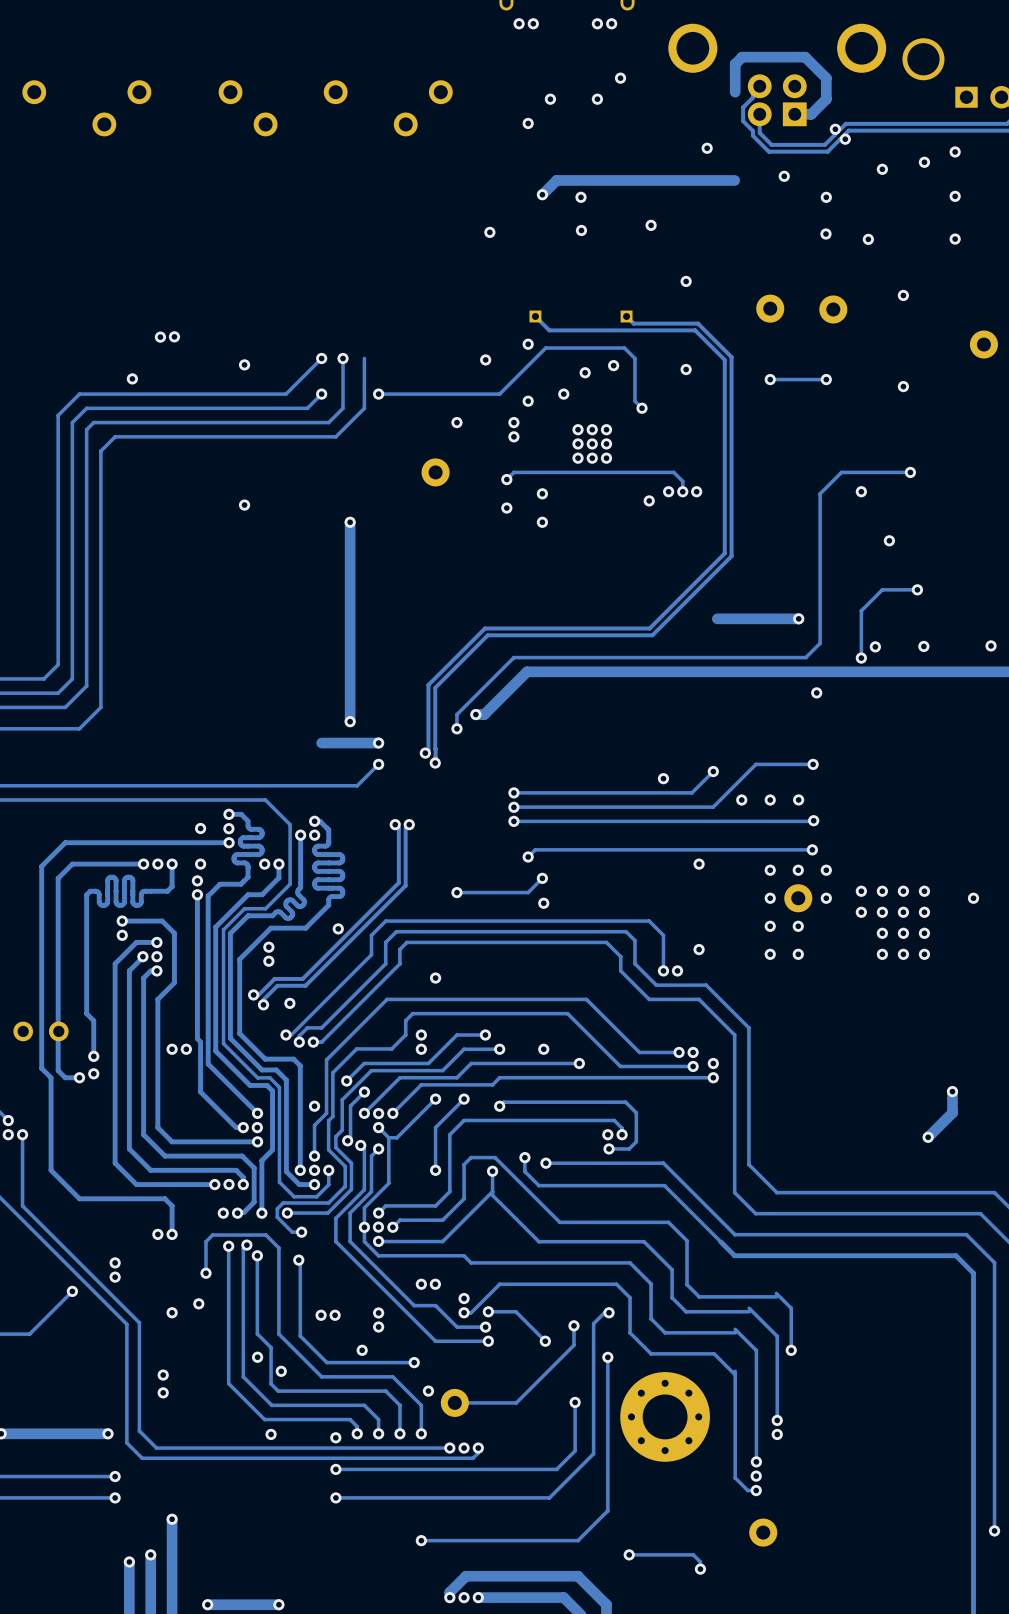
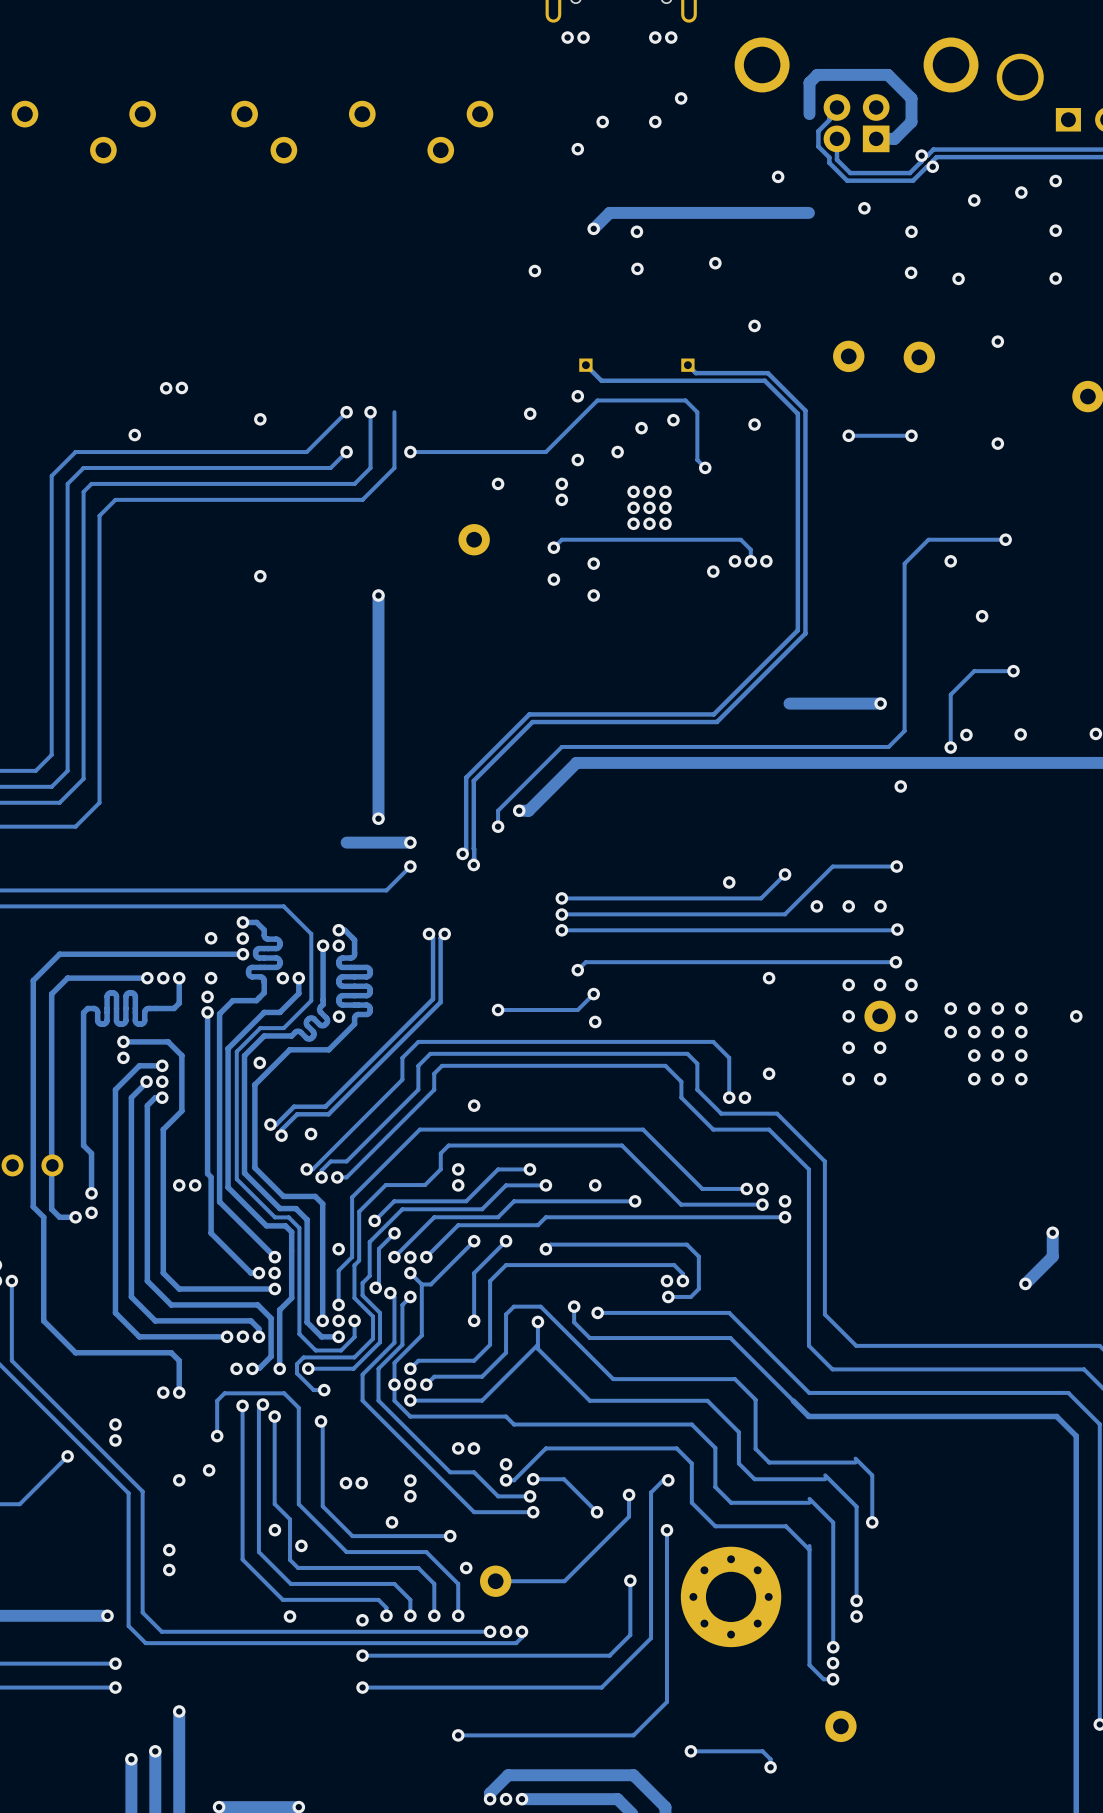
via: none -> (339, 1016)
via: (338, 928) -> none
via: none -> (259, 1062)
via: (268, 947) -> none
via: (268, 961) -> none

